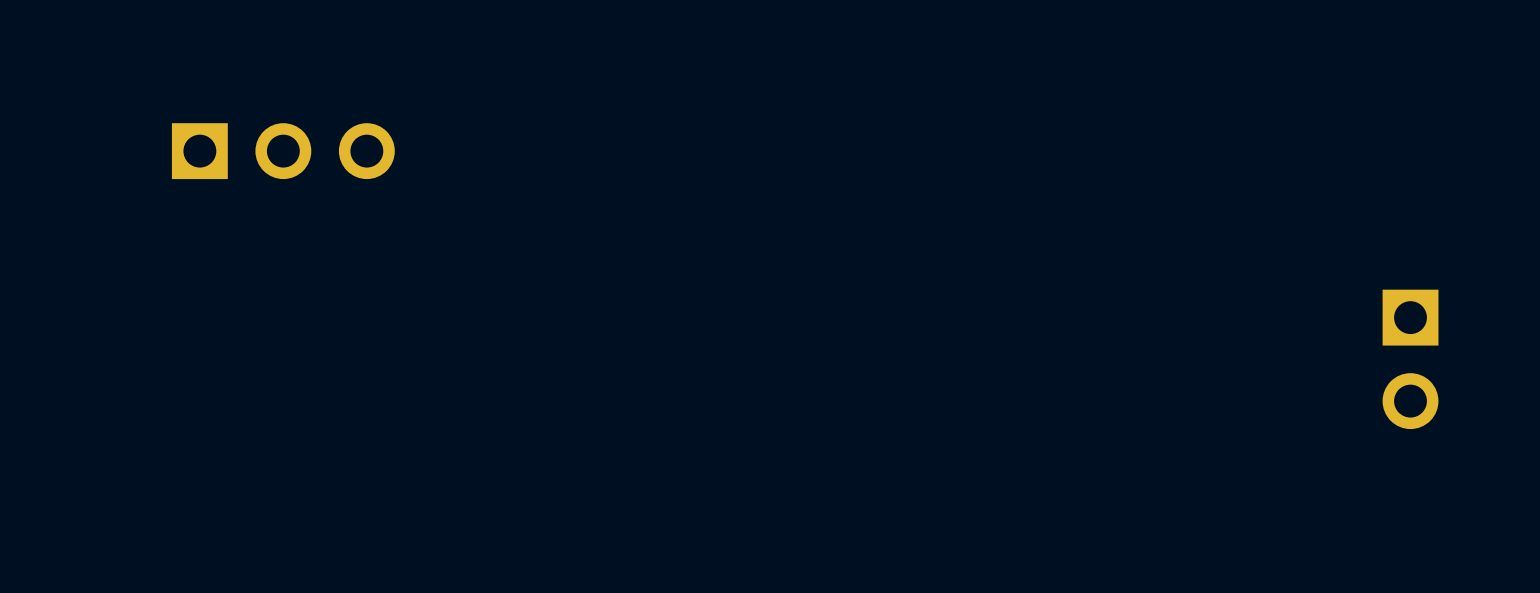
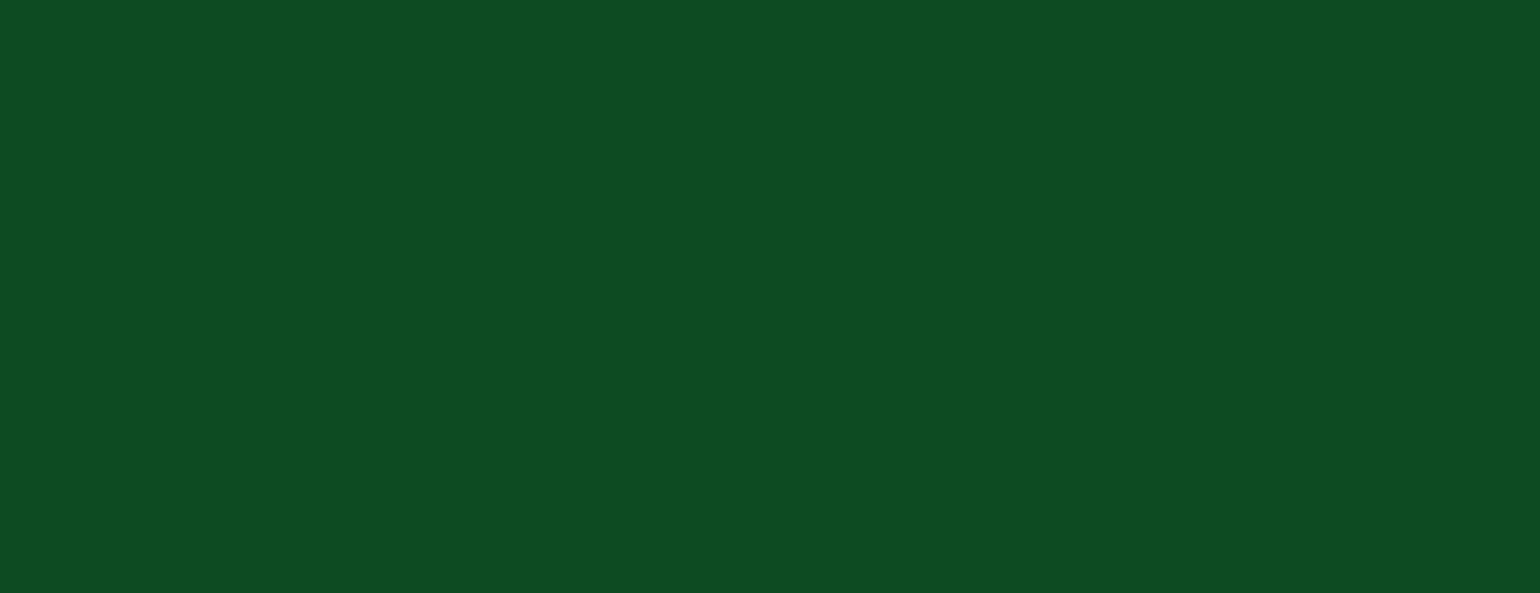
part: (283, 151) -> none
part: (1410, 359) -> none

